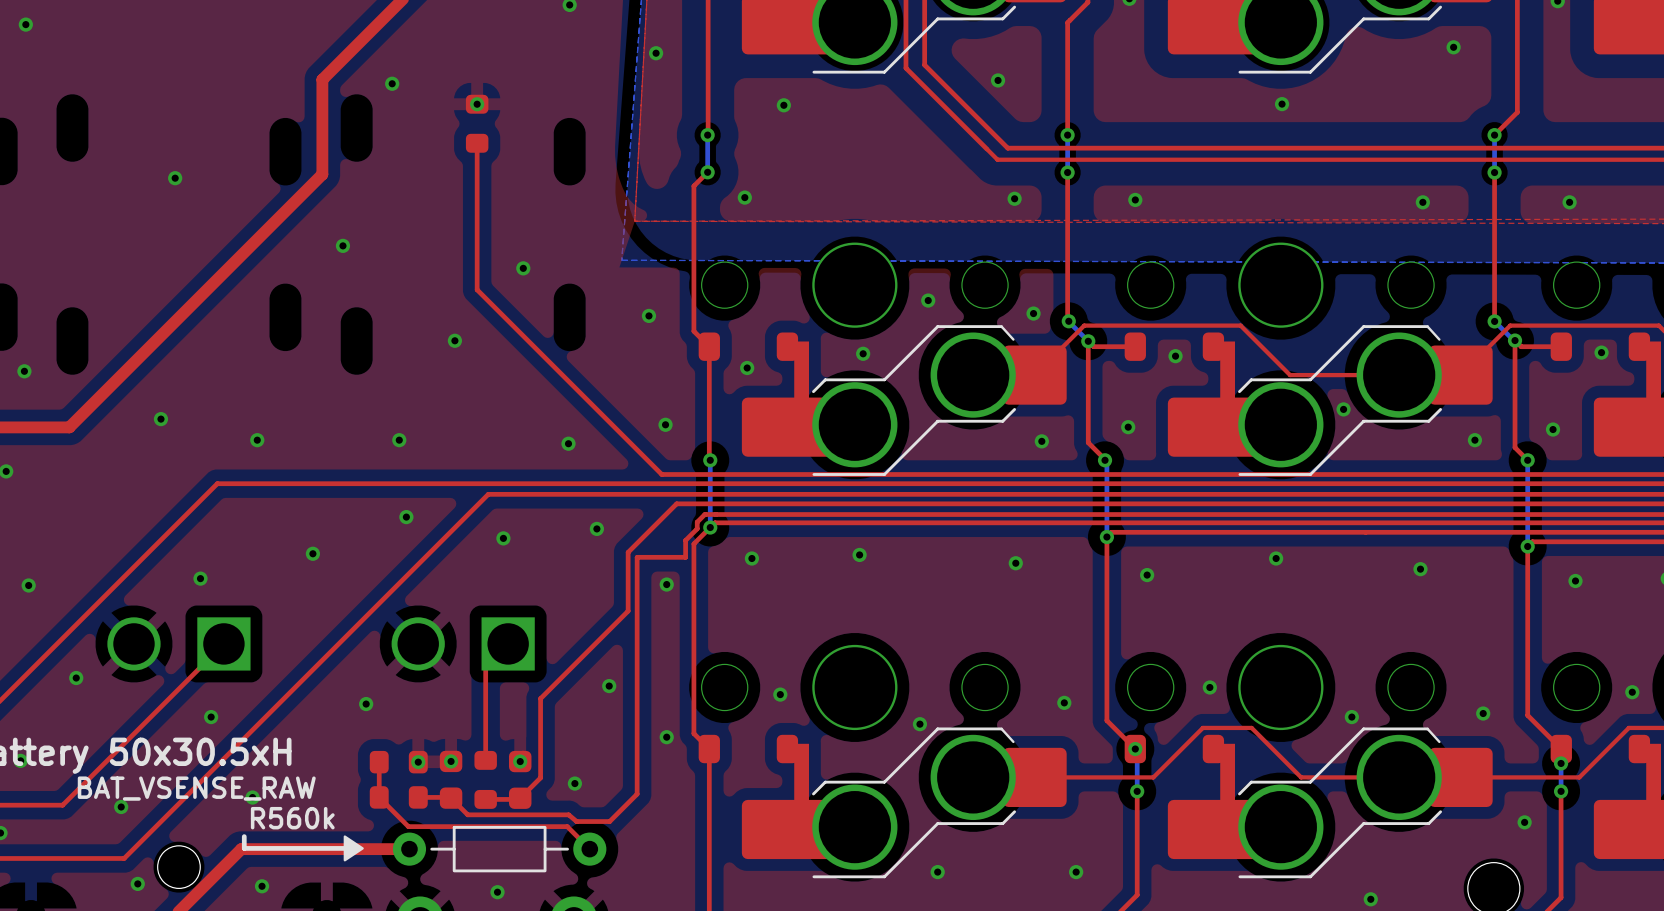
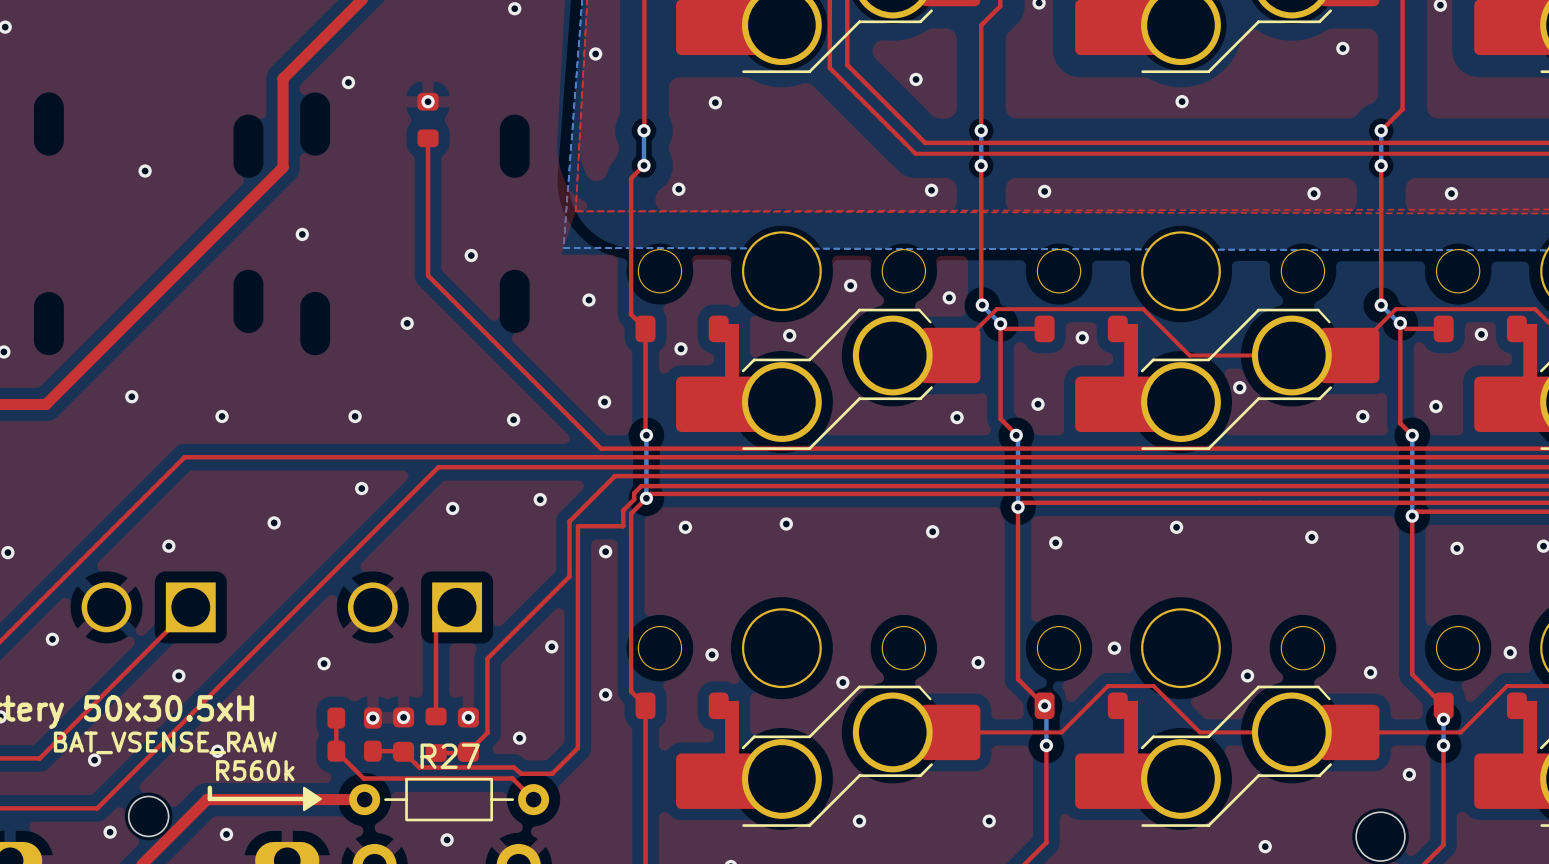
R27 name: none -> R27 (450, 756)

